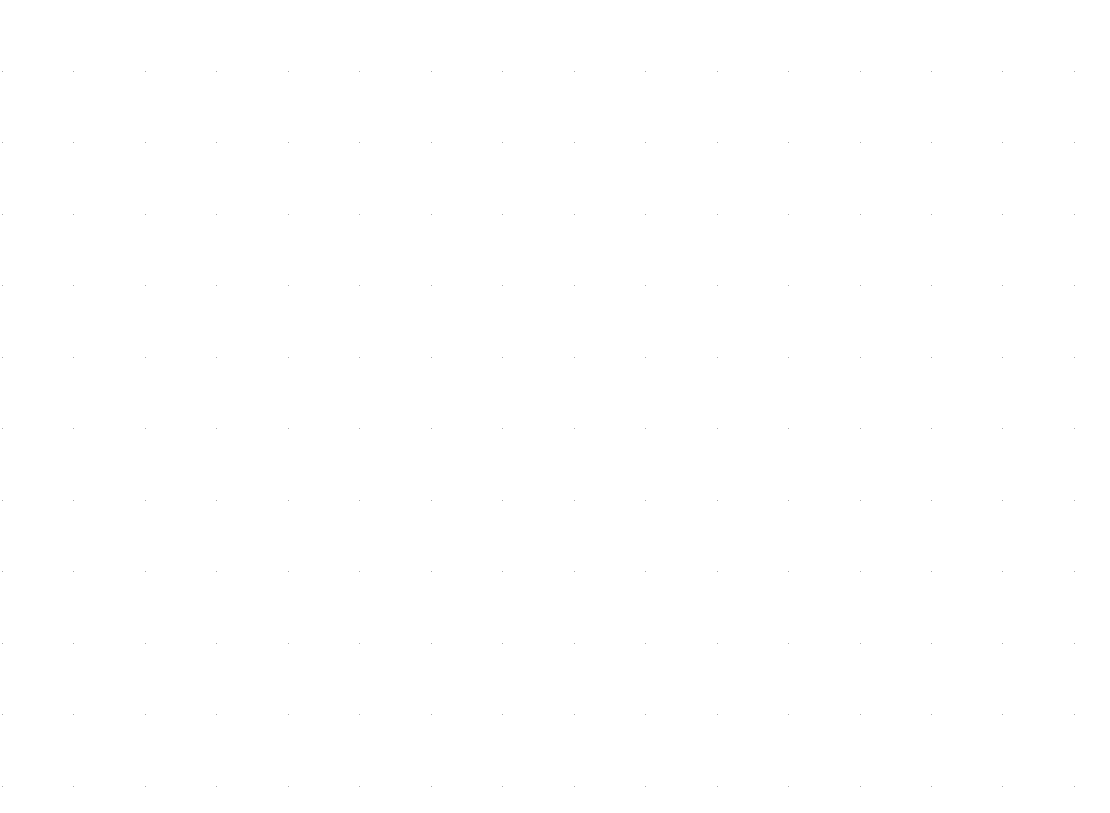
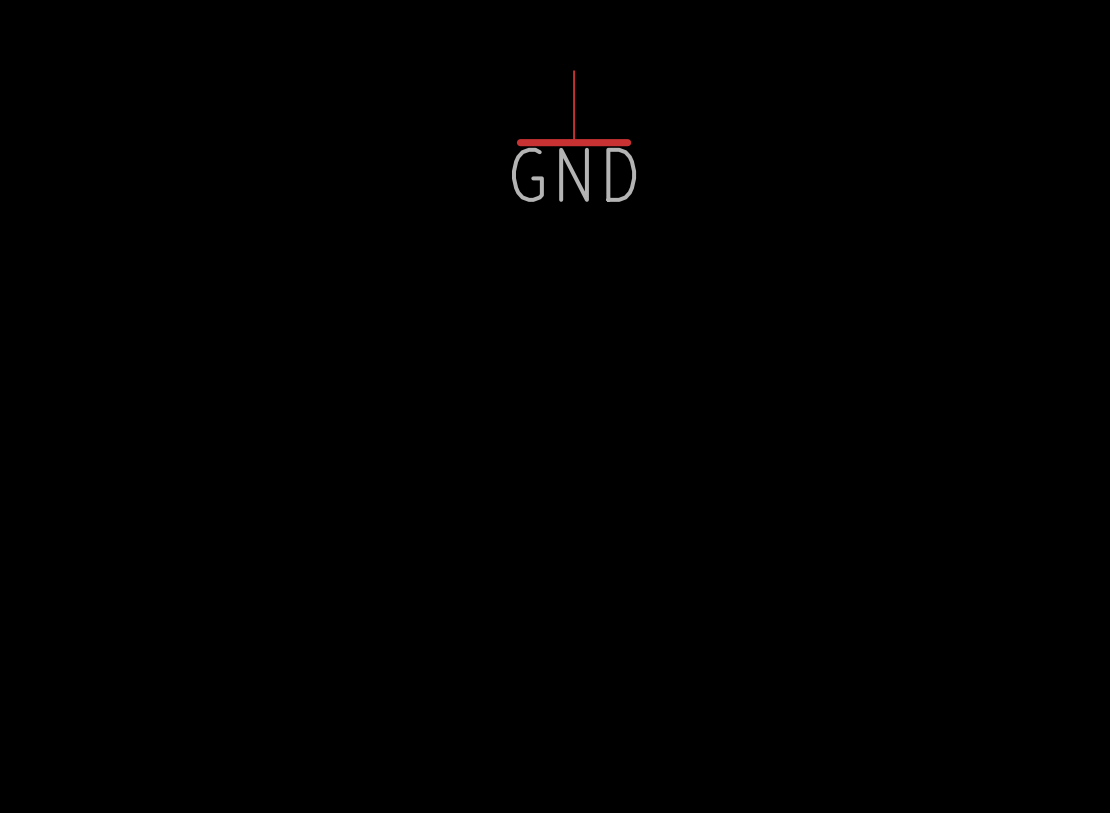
power symbol: none -> GND (574, 108)

